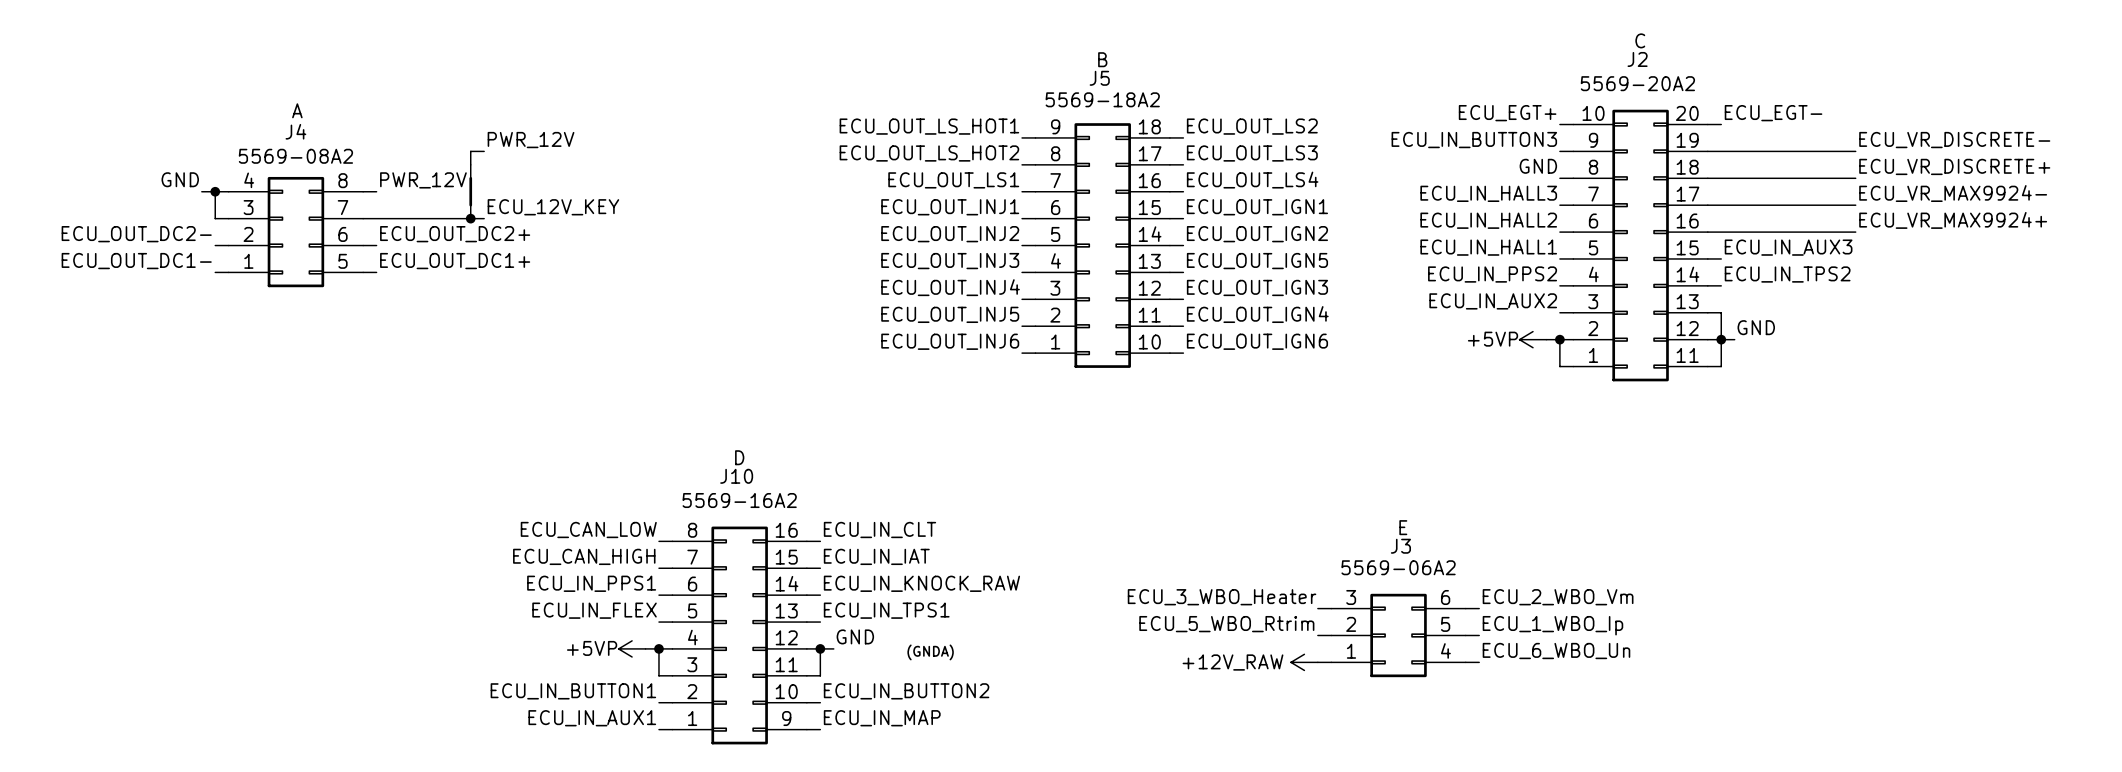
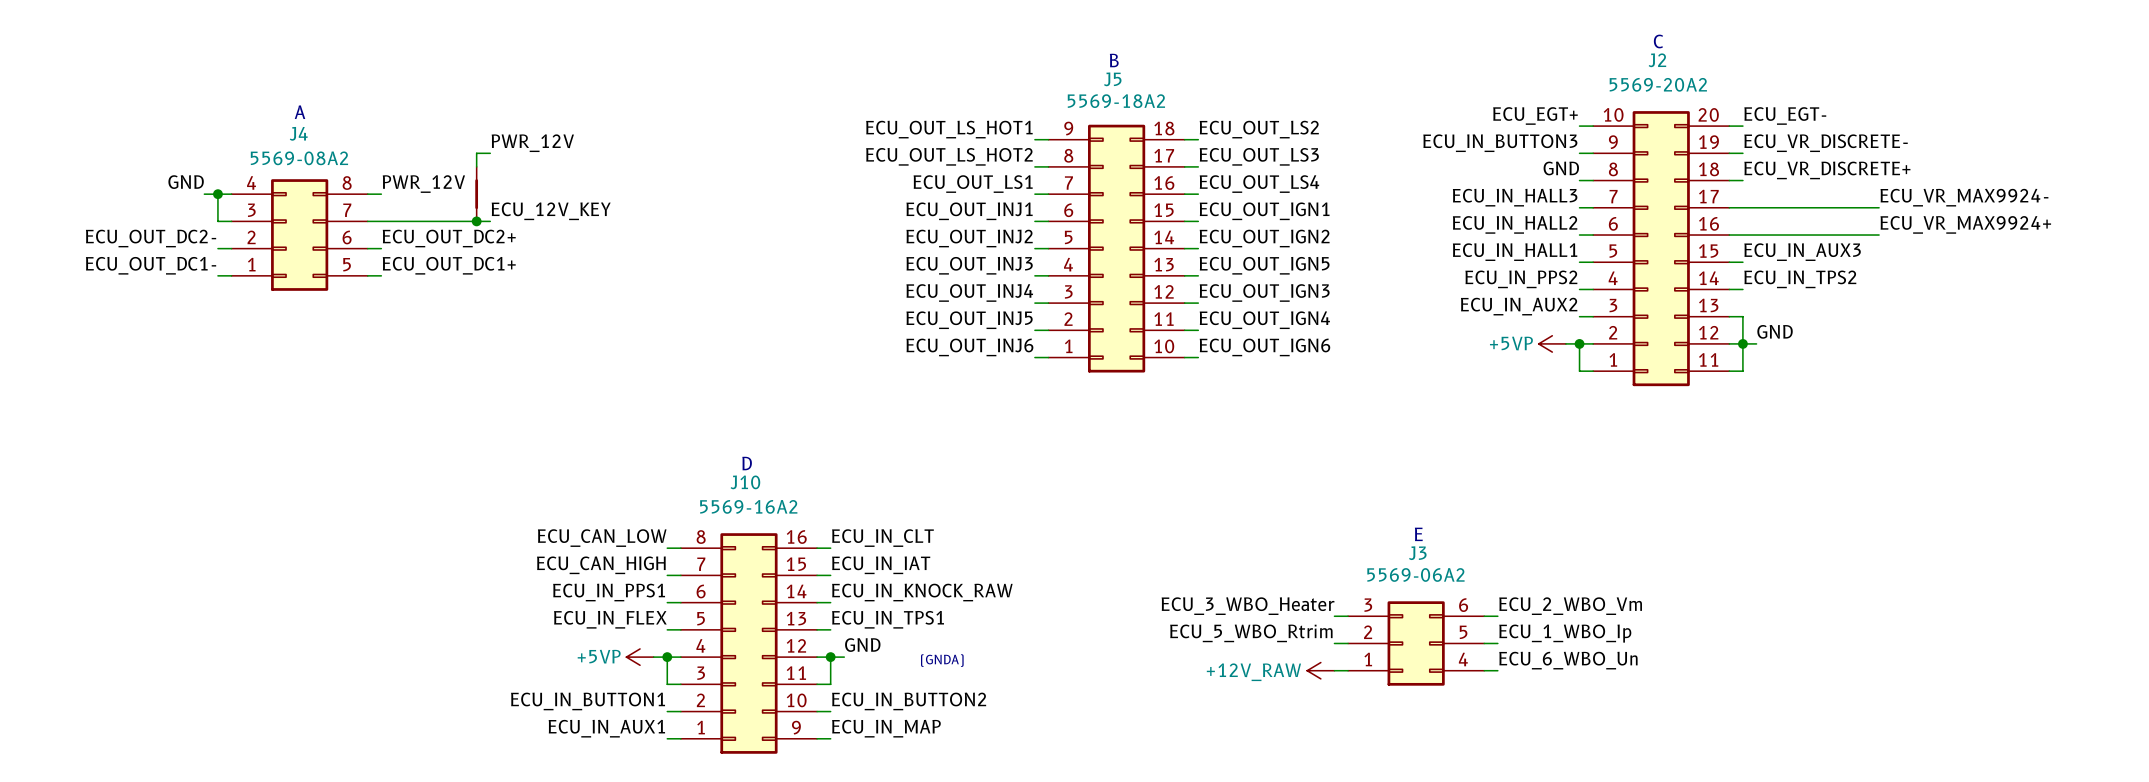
label position: ECU_VR_DISCRETE- (1954, 140) -> ECU_VR_DISCRETE- (1826, 143)
wire: (1721, 151) (1855, 151) -> none
label position: ECU_VR_DISCRETE+ (1954, 166) -> ECU_VR_DISCRETE+ (1827, 170)
wire: (1721, 178) (1855, 178) -> none

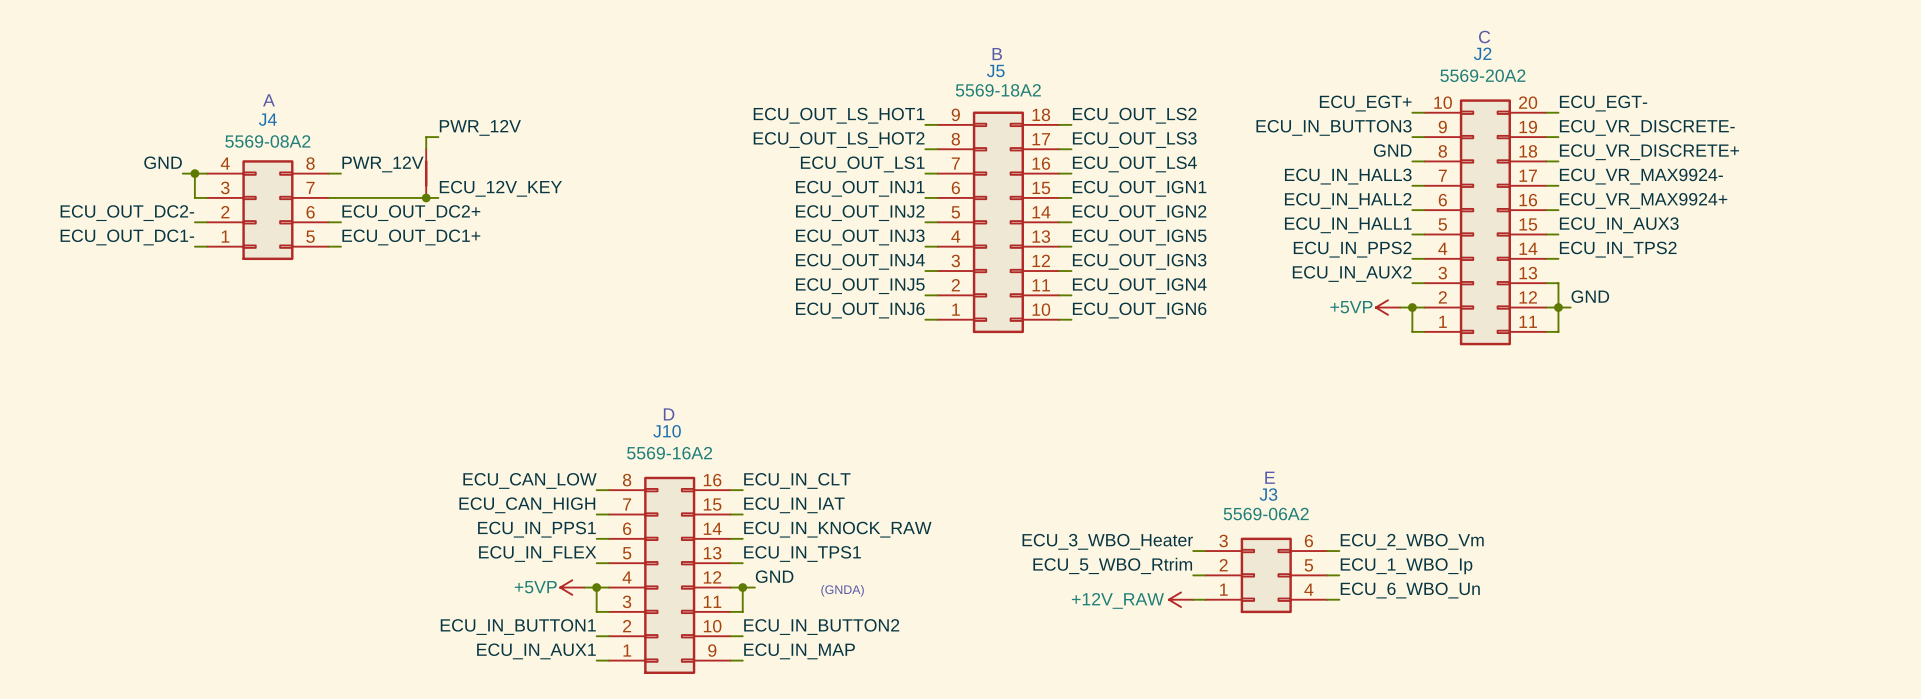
label position: ECU_VR_MAX9924- (1964, 197) -> ECU_VR_MAX9924- (1641, 176)
wire: (1742, 207) (1879, 207) -> none
label position: ECU_VR_MAX9924+ (1965, 224) -> ECU_VR_MAX9924+ (1643, 200)
wire: (1742, 235) (1879, 235) -> none

